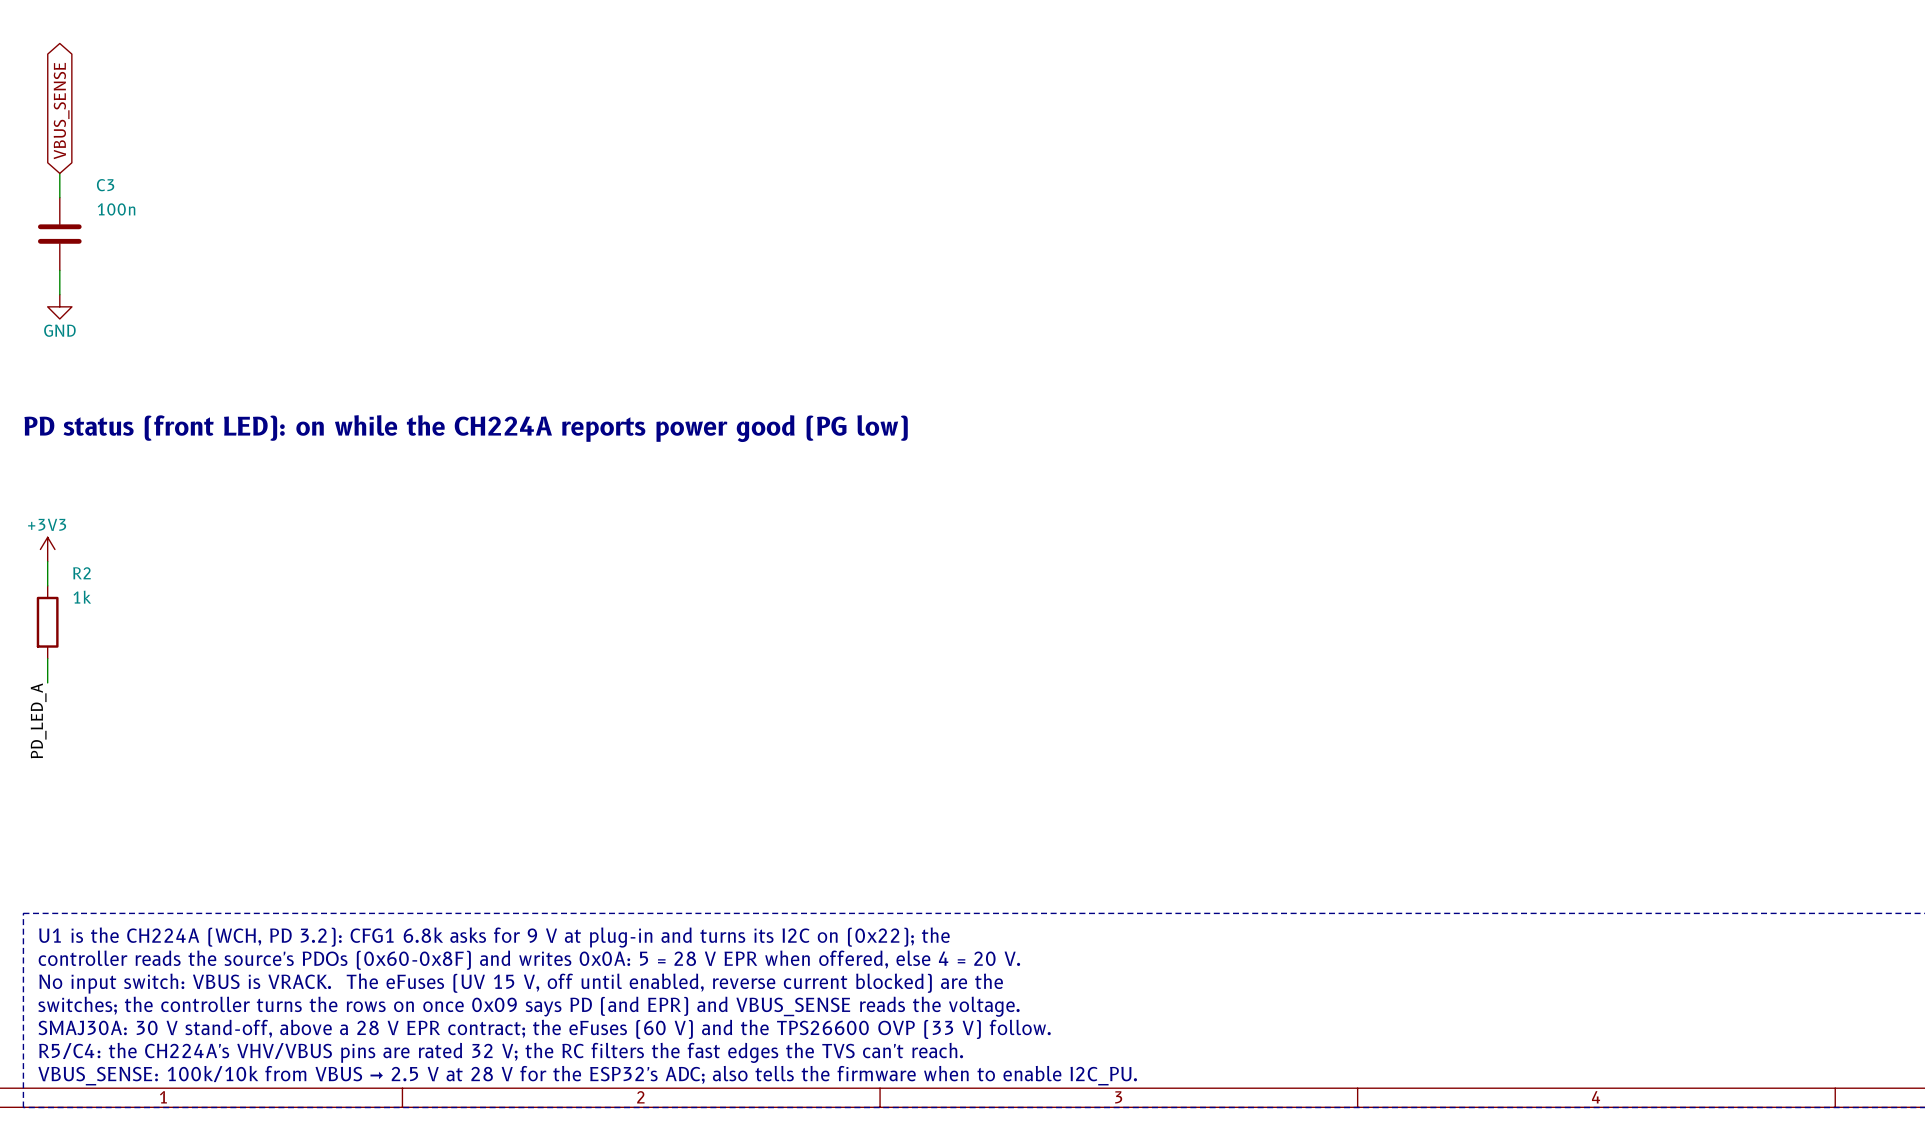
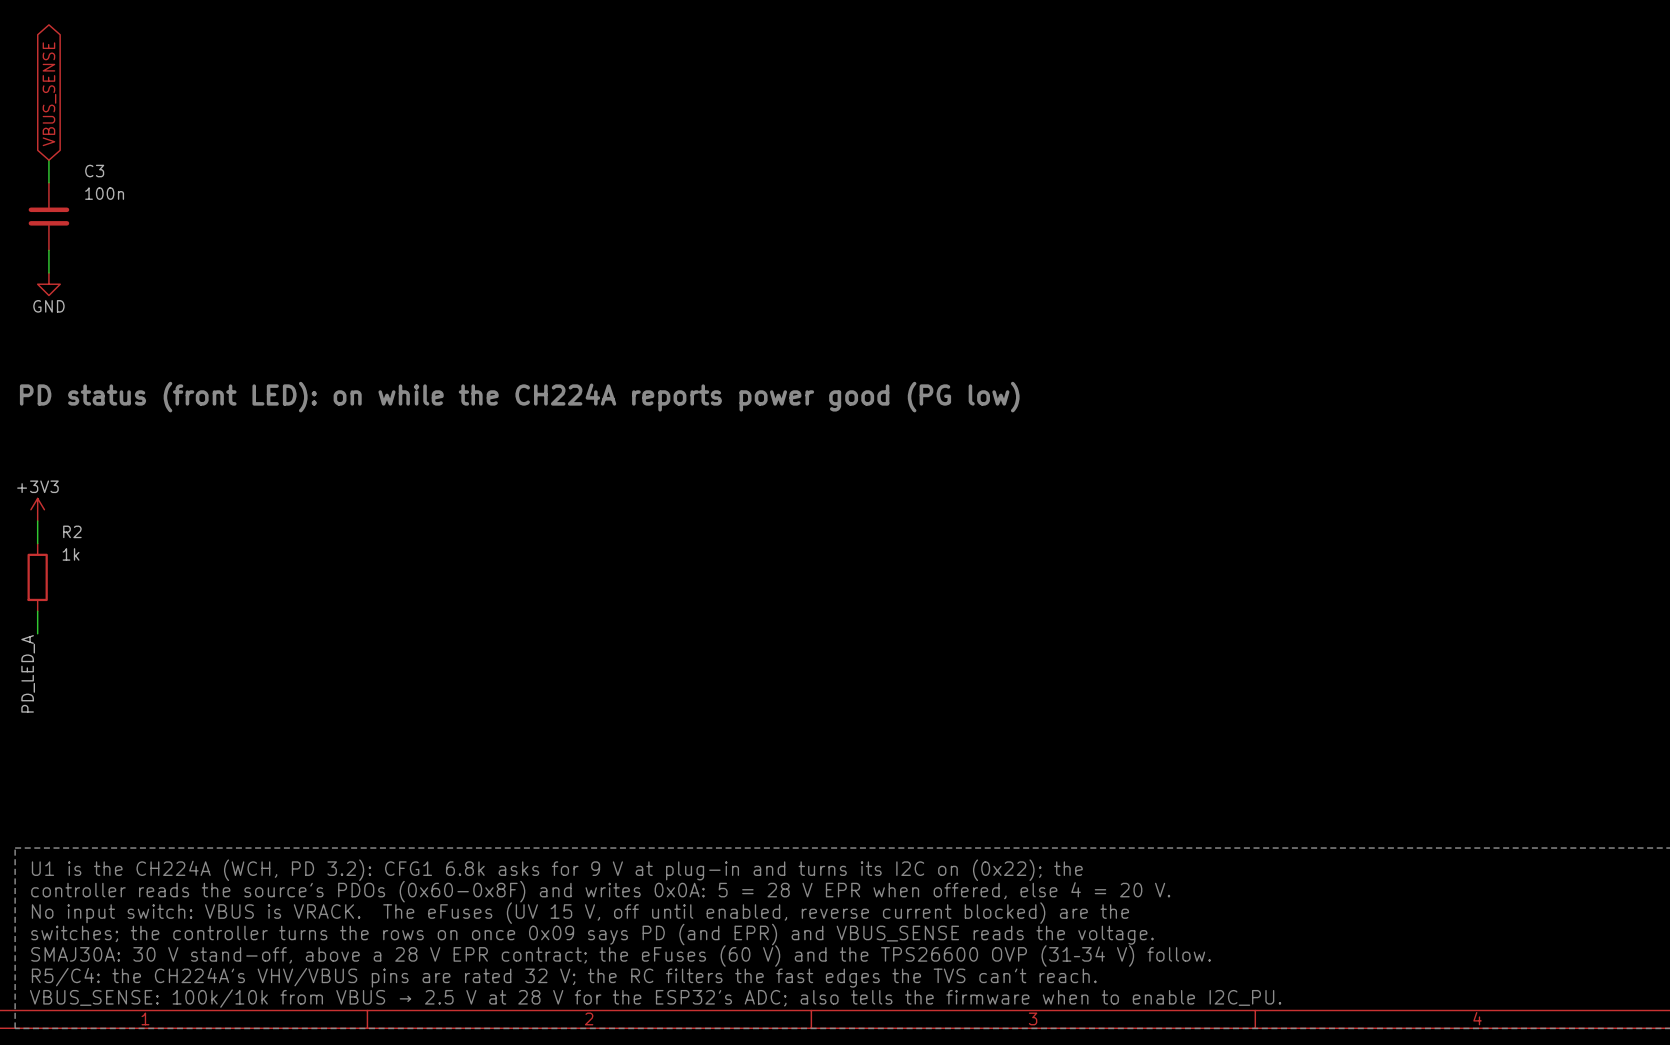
text: SMAJ30A: 30 V stand-off, above a 28 V EPR contract; the eFuses (60 V) and the TPS26600 OVP (33 V) follow. (544, 1029) -> SMAJ30A: 30 V stand-off, above a 28 V EPR contract; the eFuses (60 V) and the TPS26600 OVP (31–34 V) follow. (621, 955)

